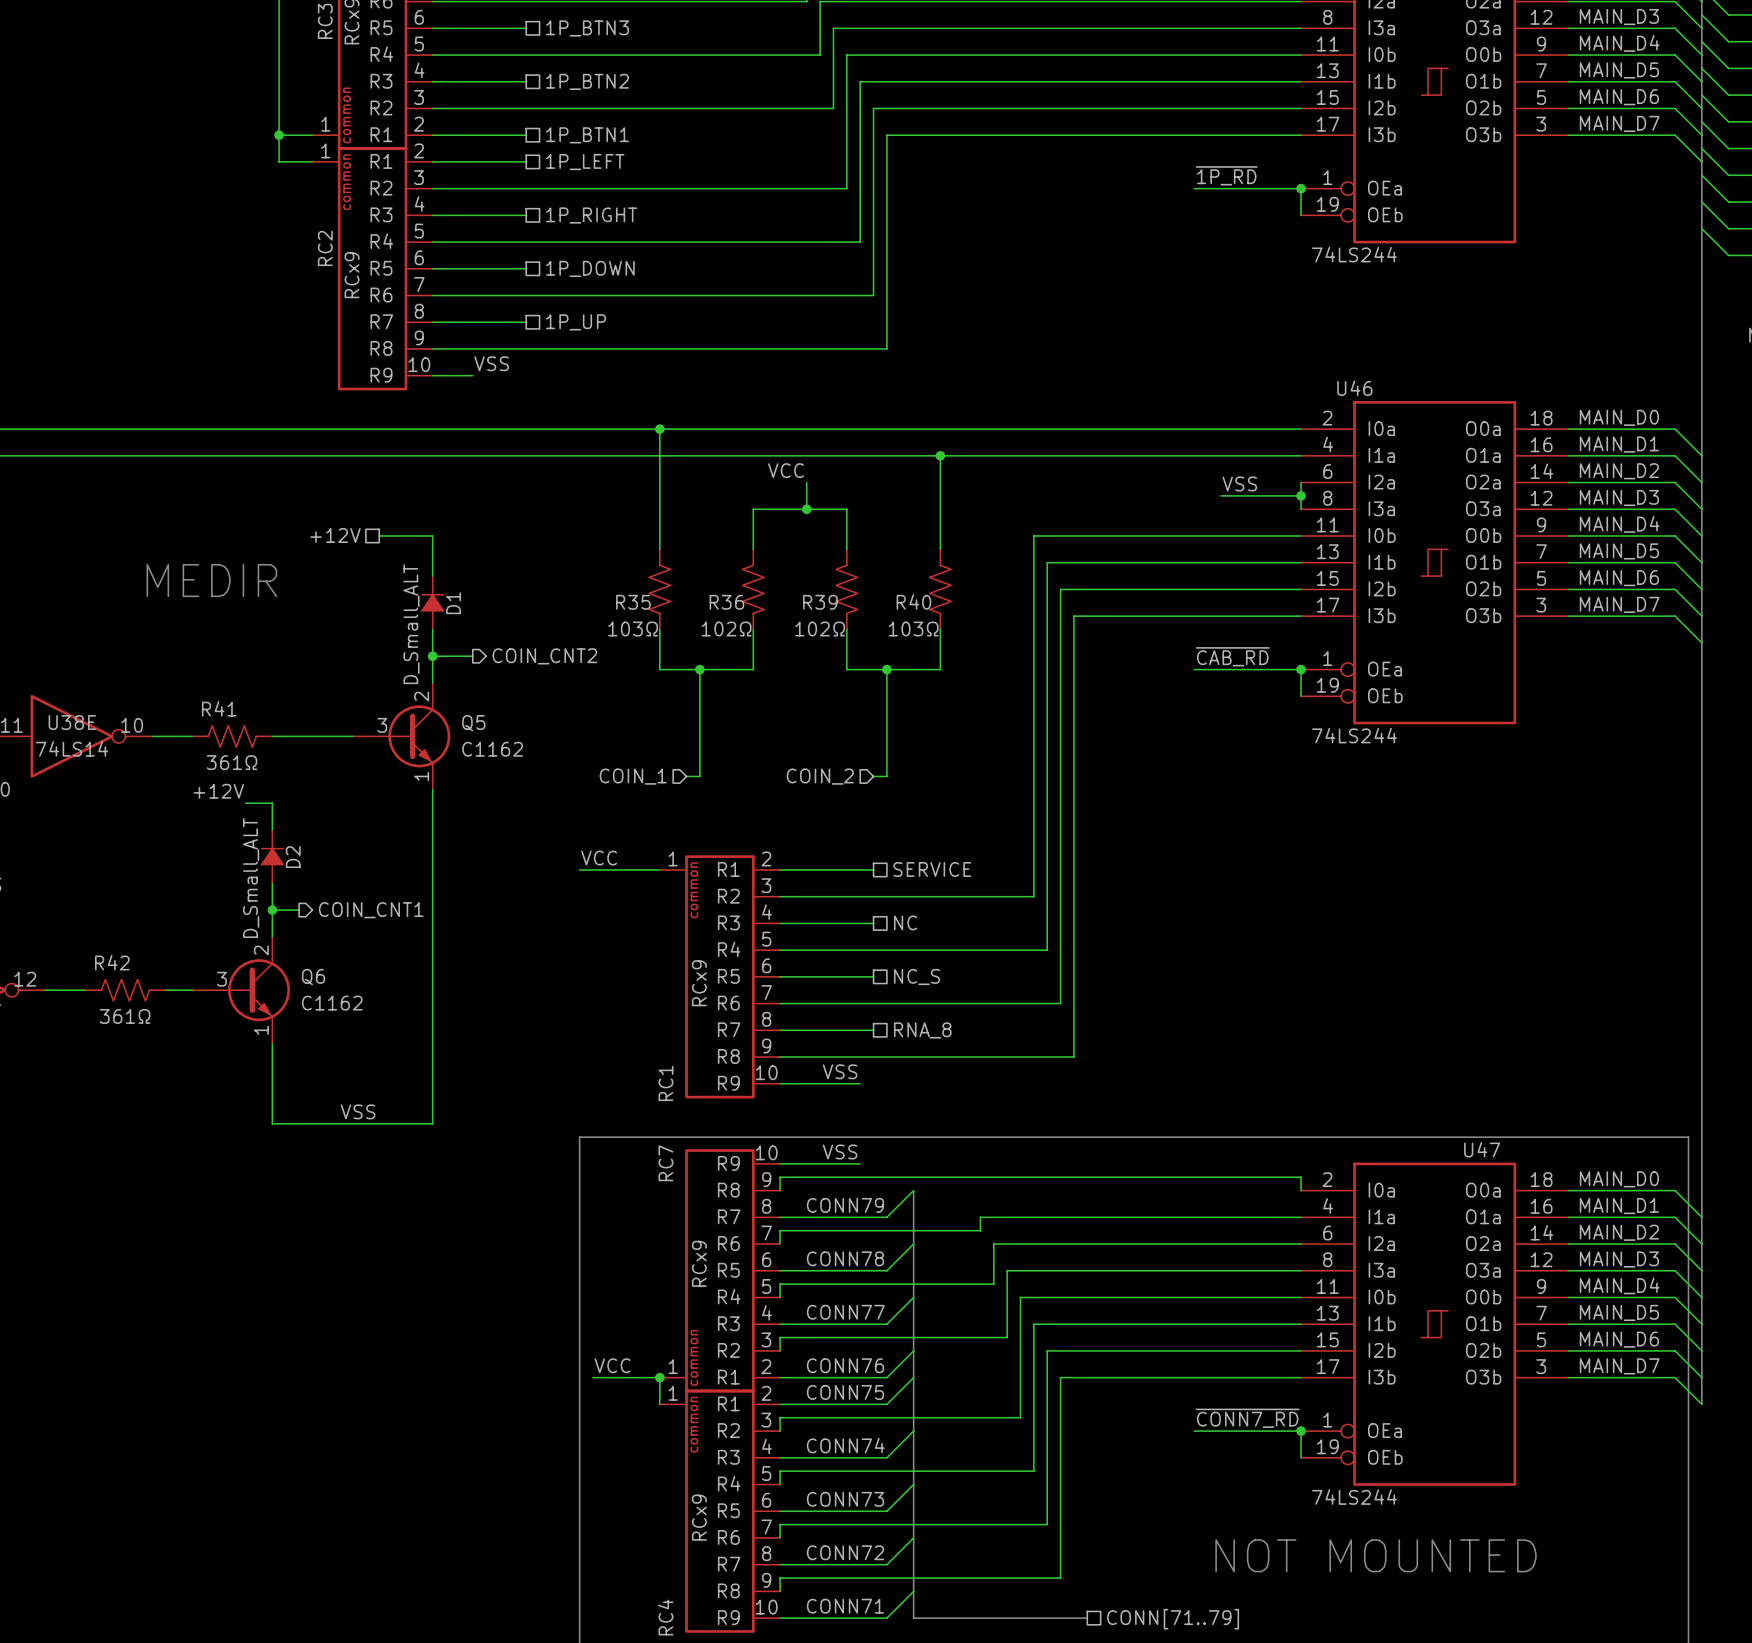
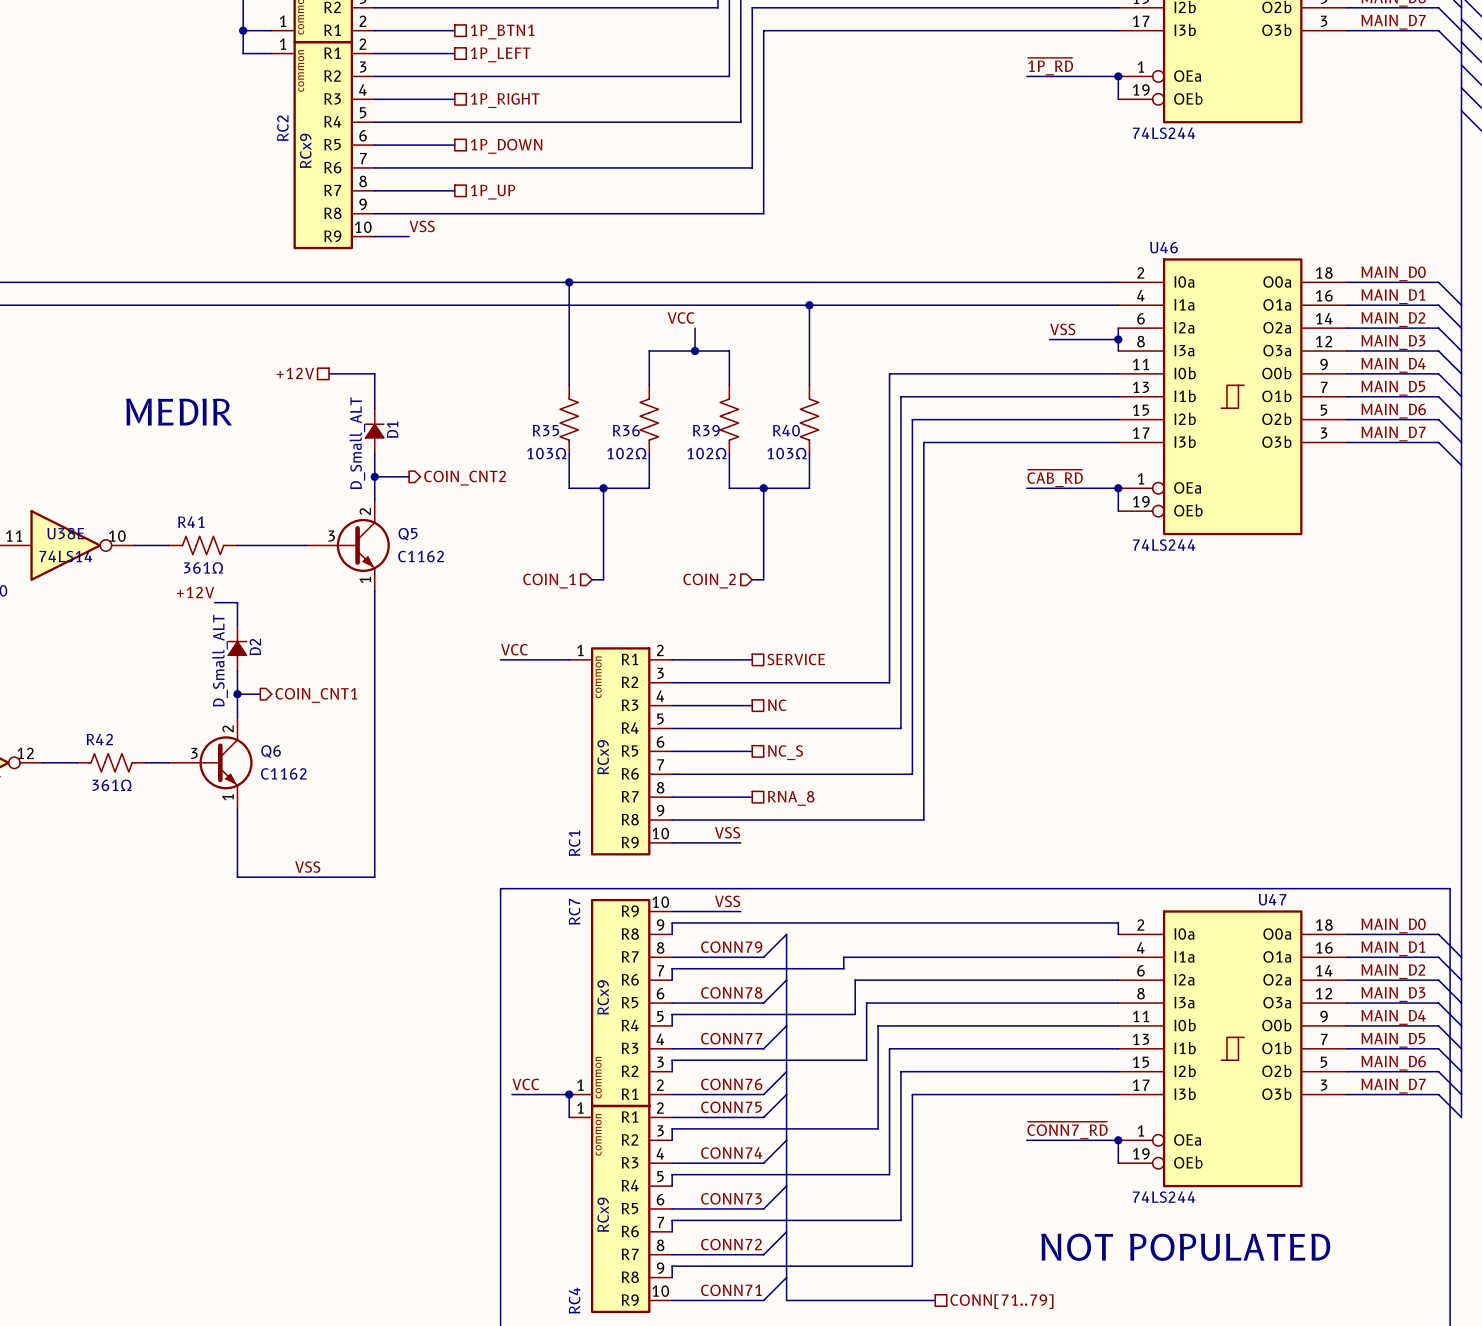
text: NOT MOUNTED (1376, 1555) -> NOT POPULATED (1185, 1247)

